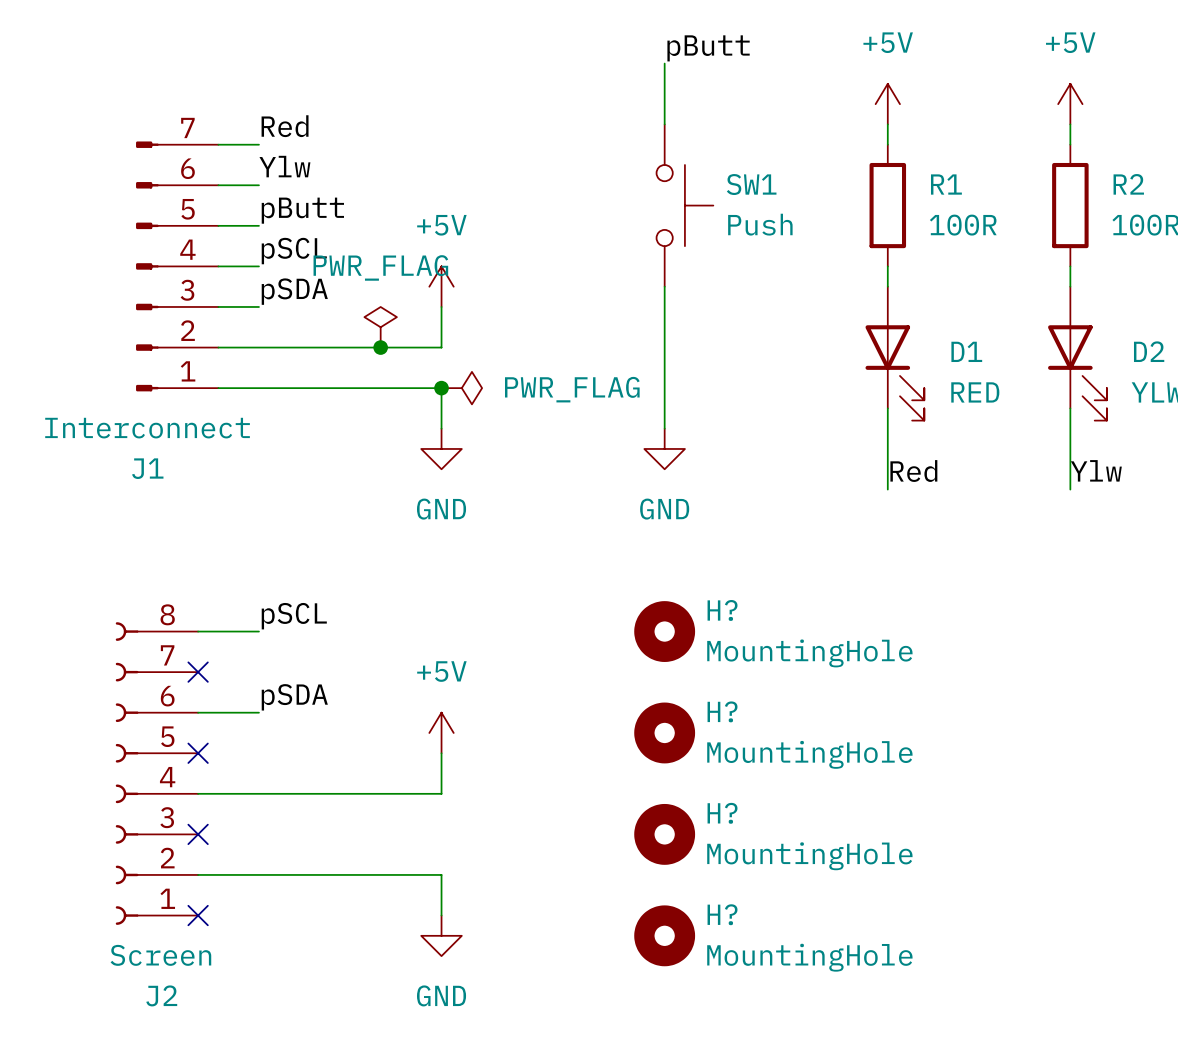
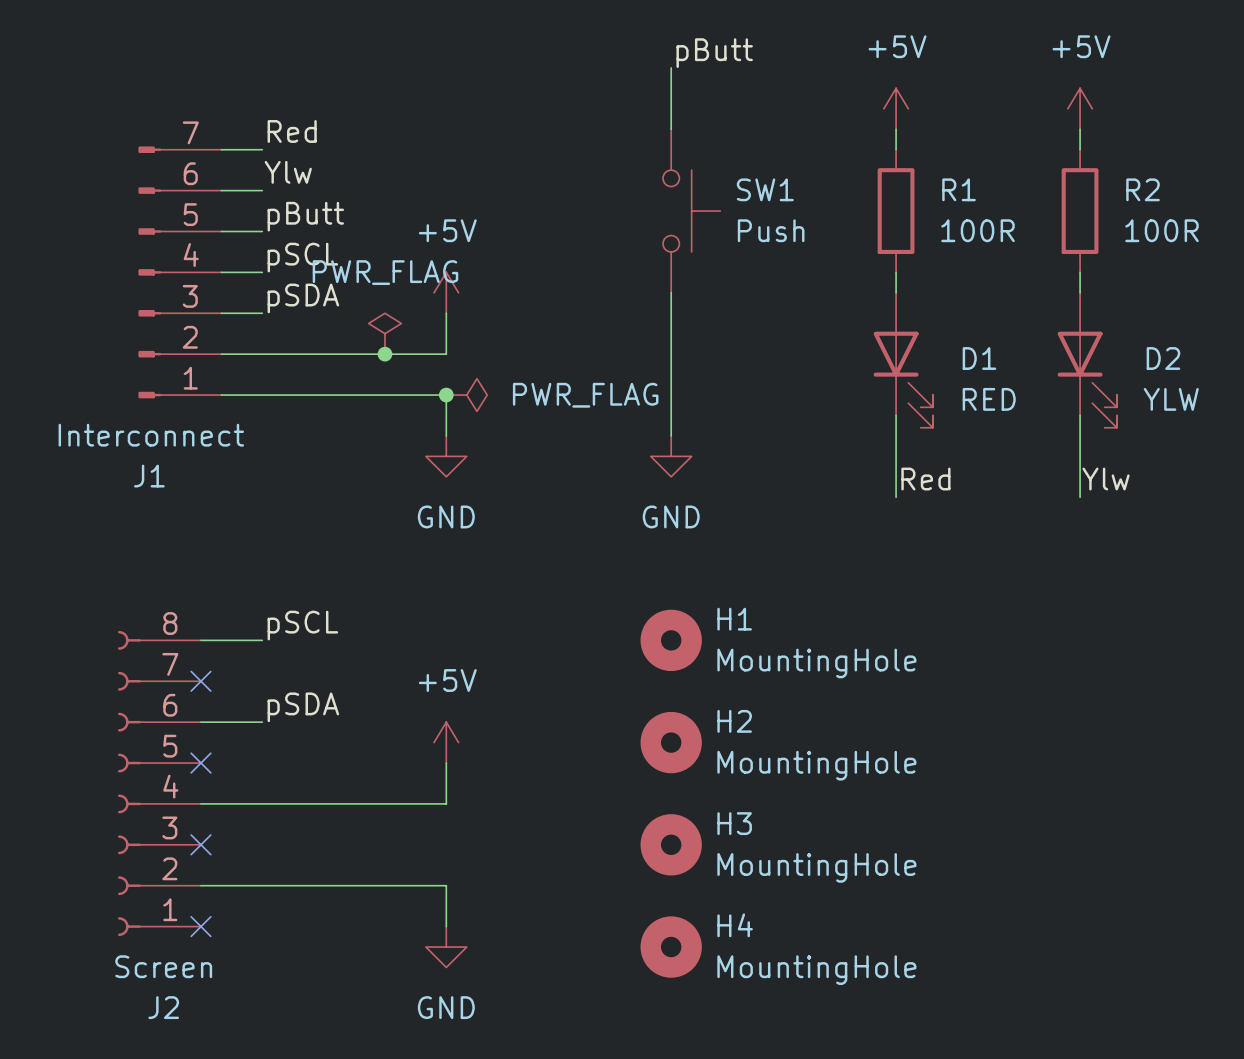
H? name: H? (722, 610) -> H1 (734, 619)
H? name: H? (722, 711) -> H2 (734, 721)
H? name: H? (722, 813) -> H3 (734, 823)
H? name: H? (722, 914) -> H4 (735, 925)

